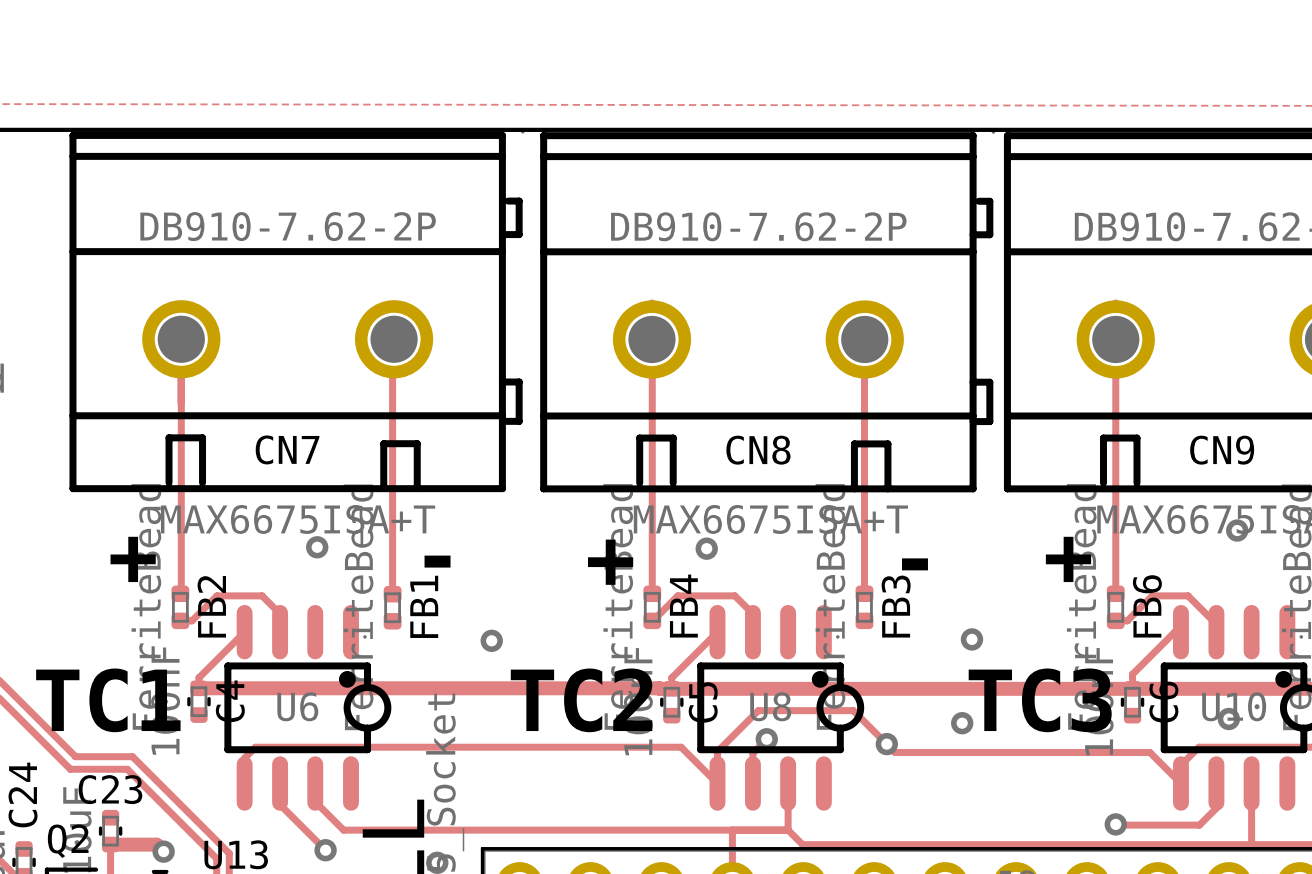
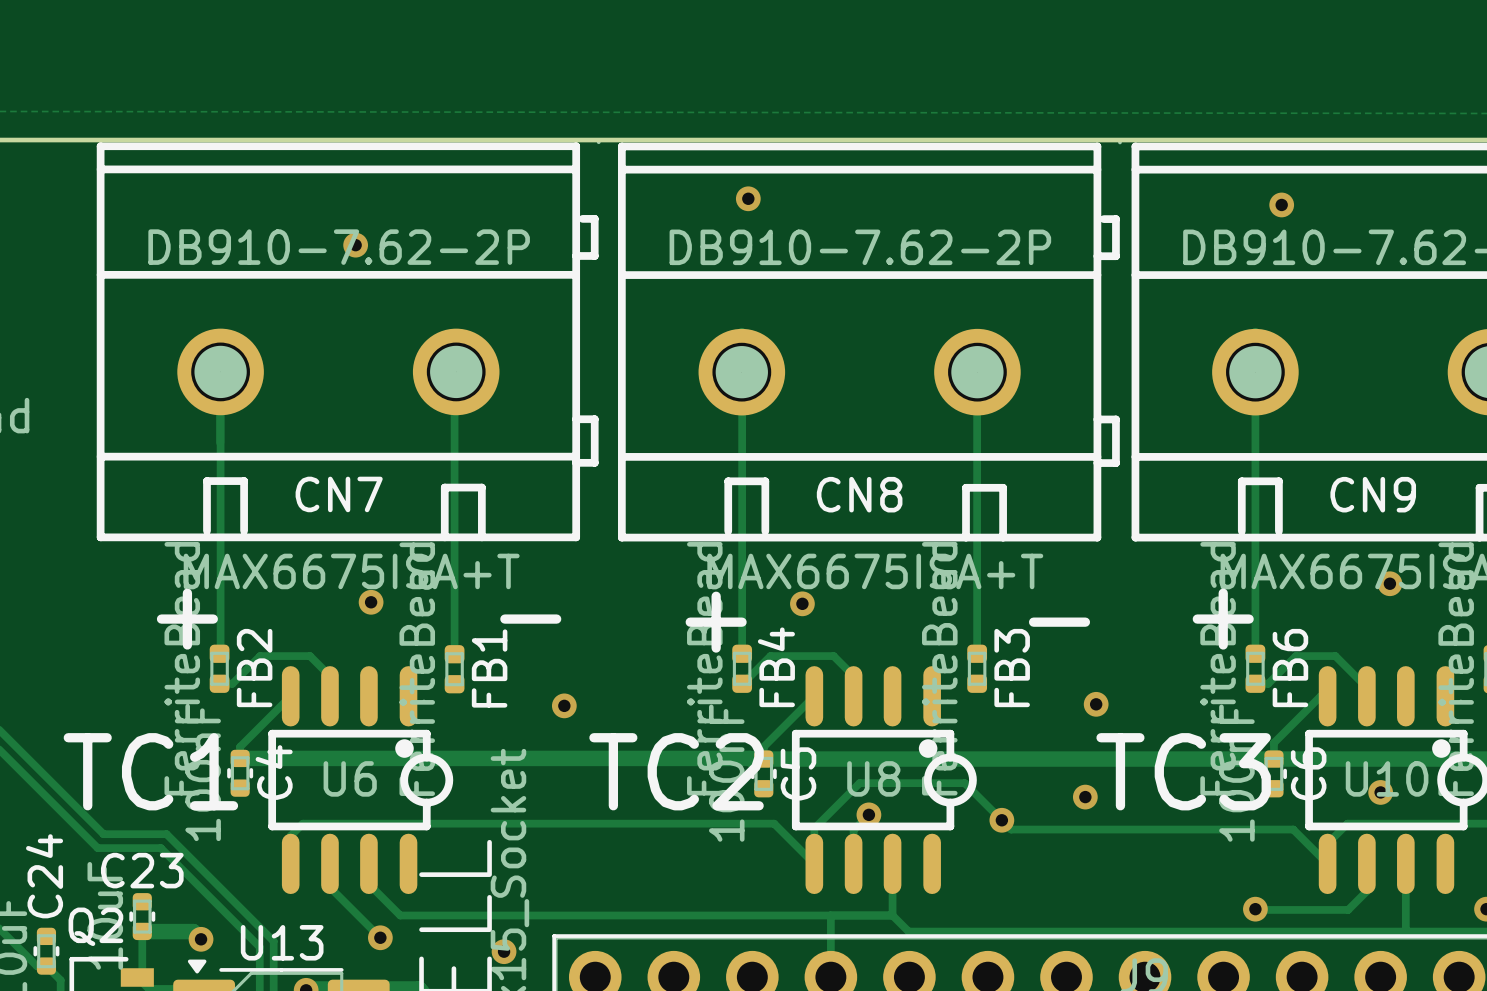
via: none -> (748, 198)
via: none -> (1281, 204)
via: none -> (355, 245)

